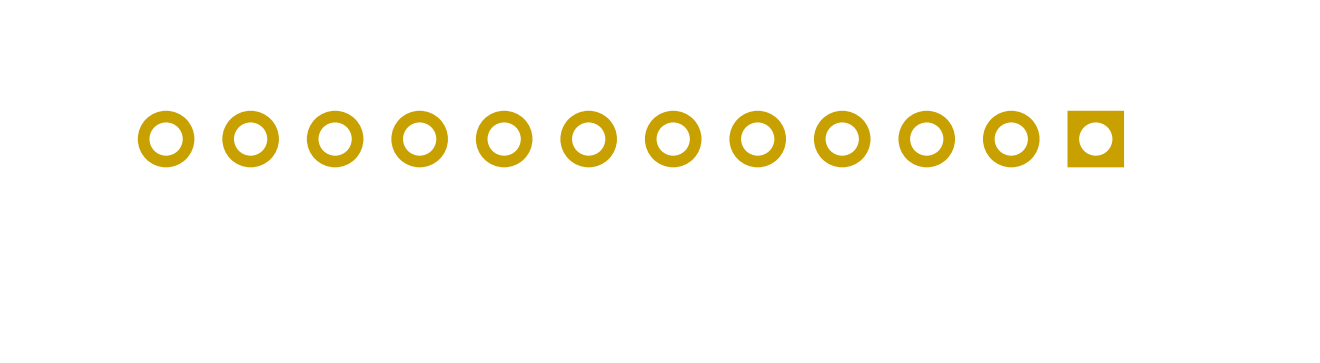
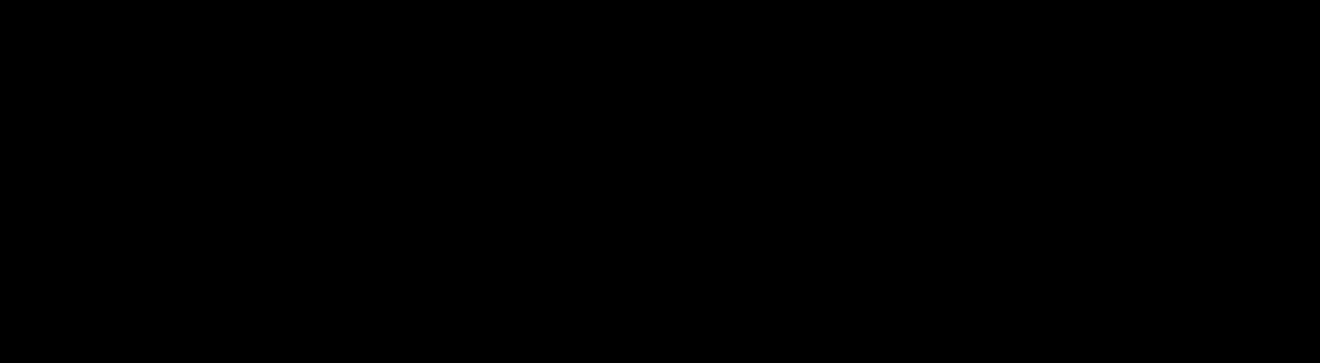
part: (630, 139) -> none

